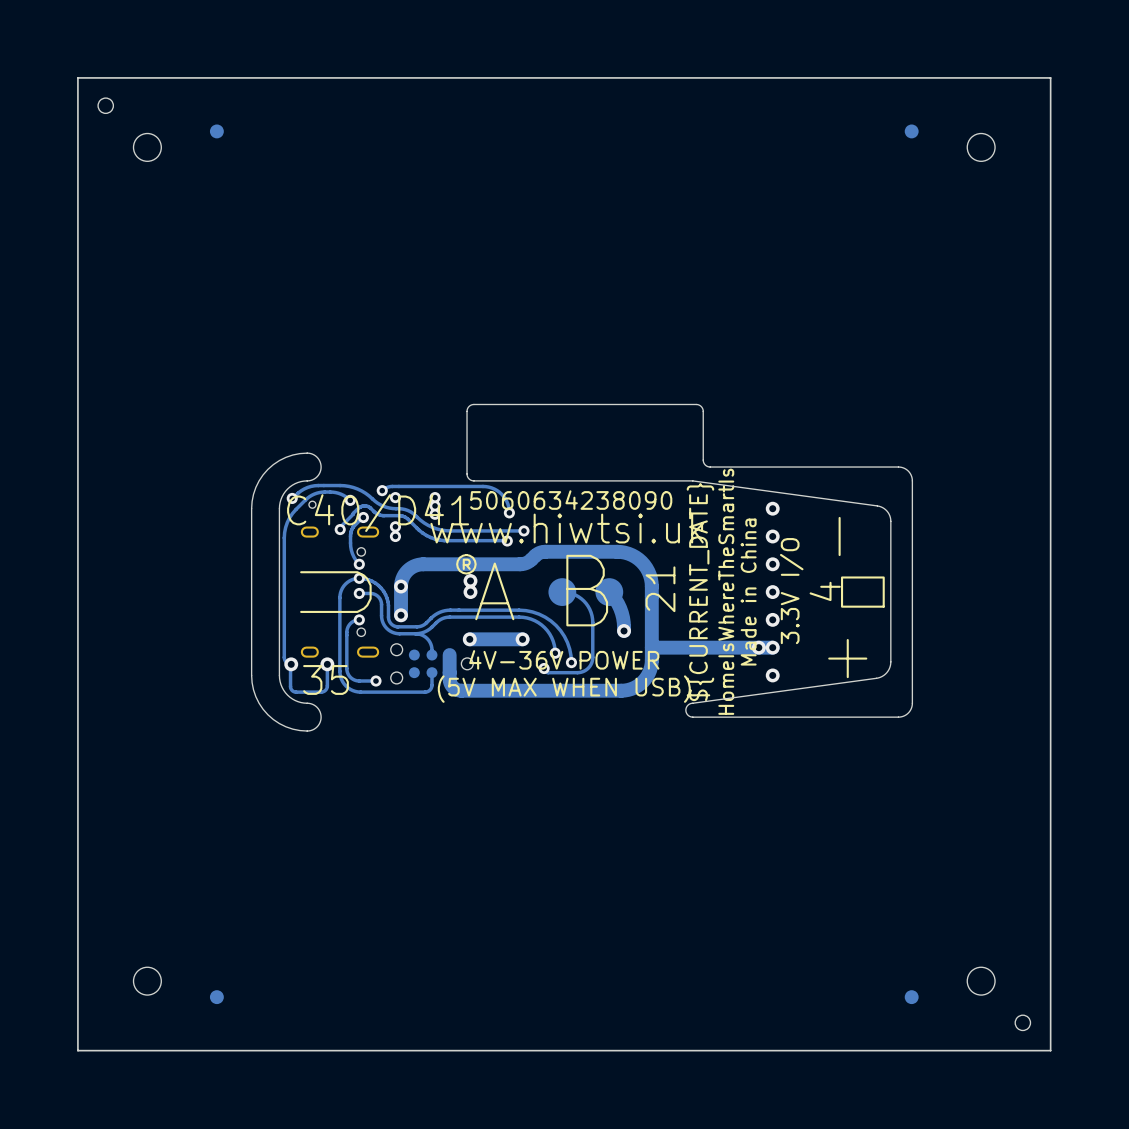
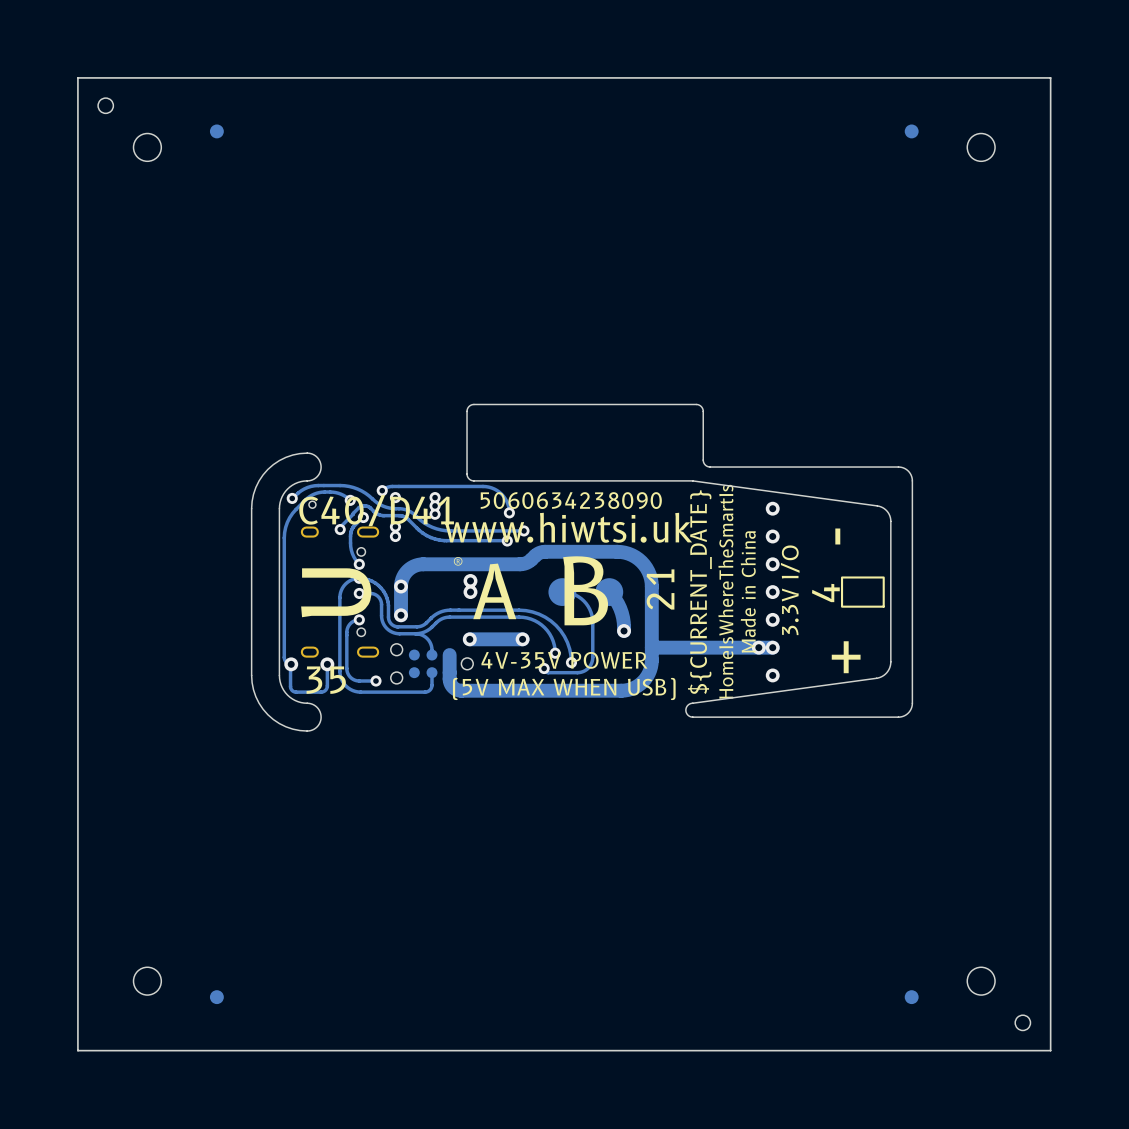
text: 4V-36V POWER (564, 659) -> 4V-35V POWER (564, 660)

